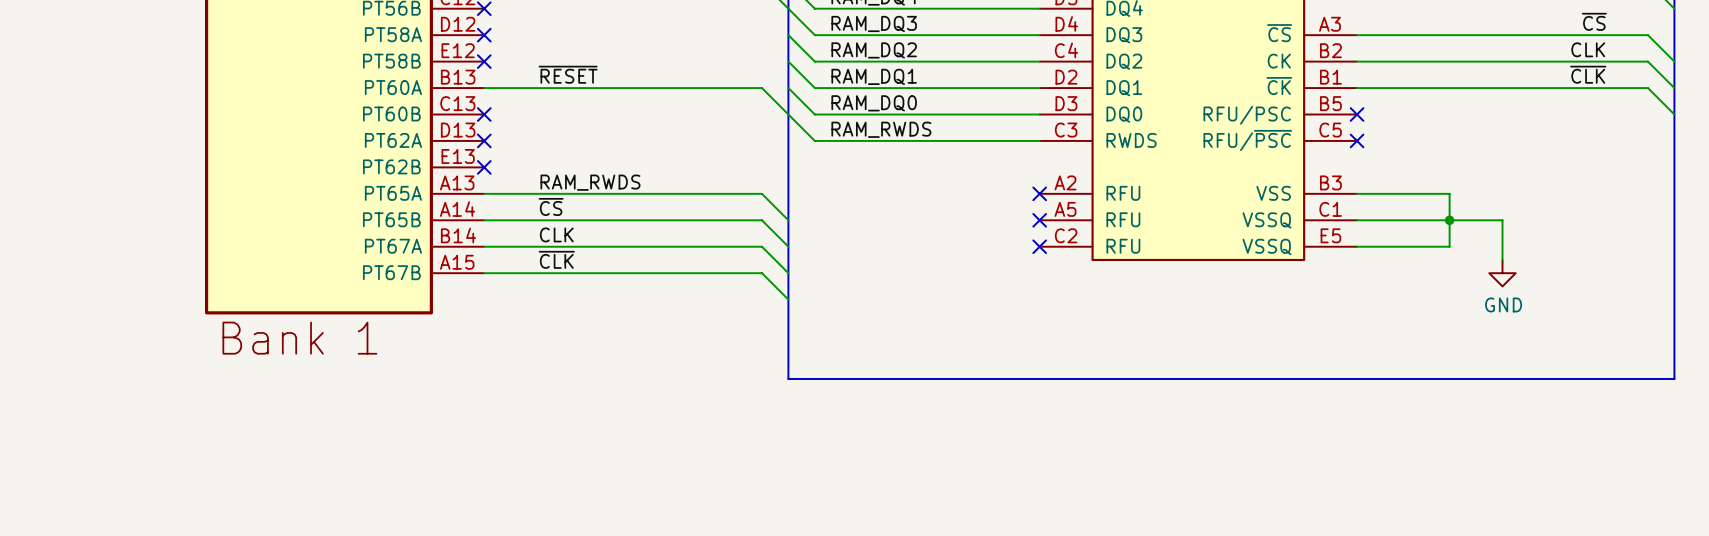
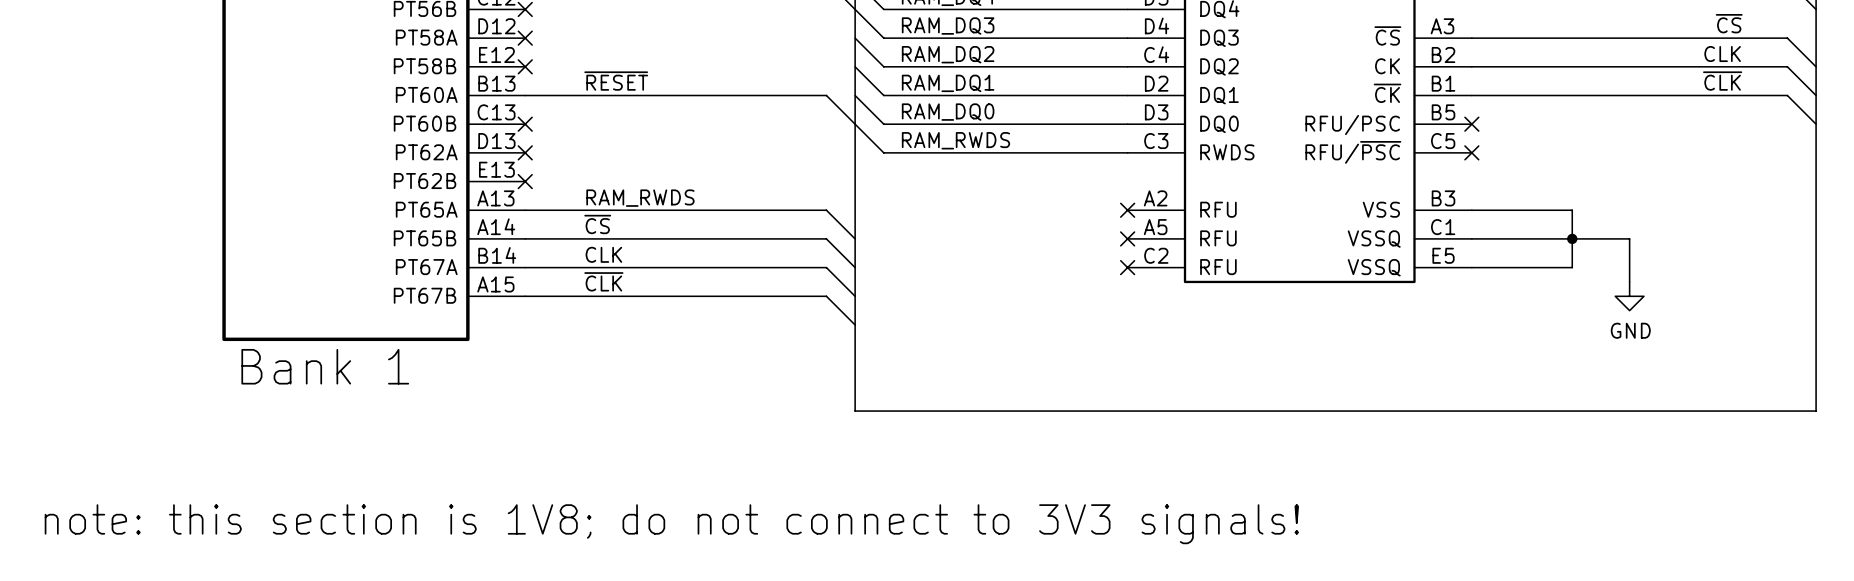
text: none -> note: this section is 1V8; do not connect to 3V3 signals! (671, 524)

